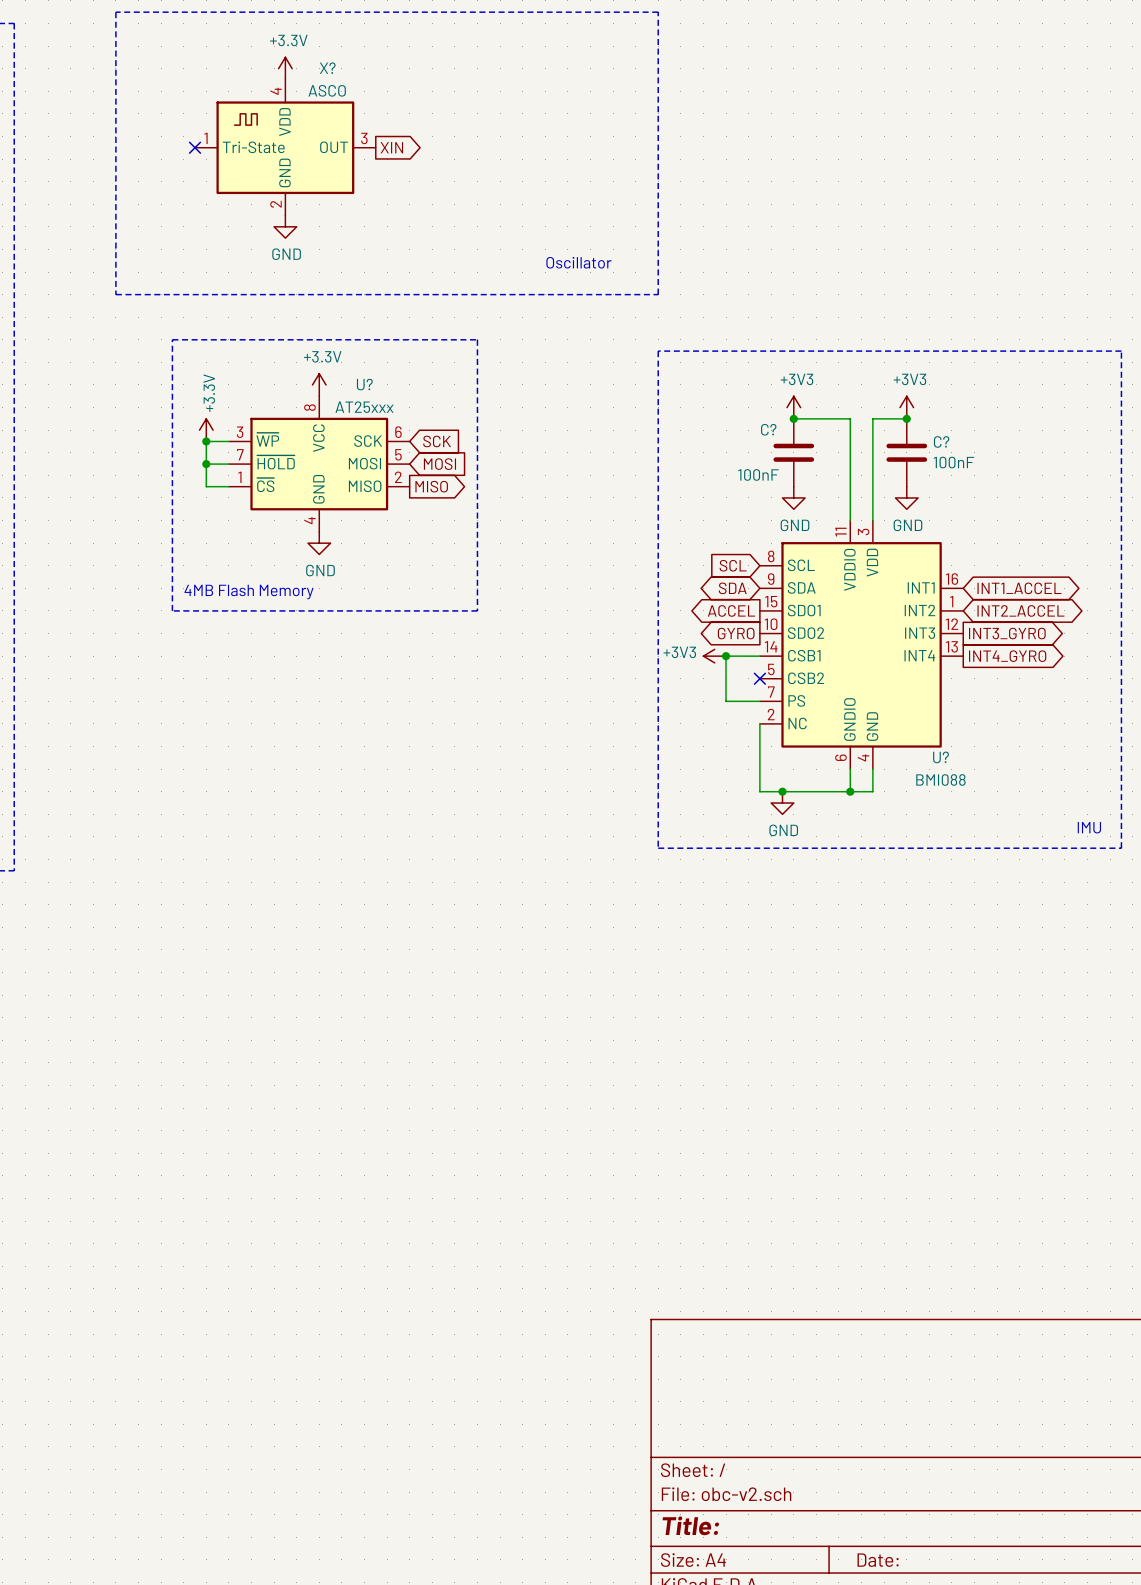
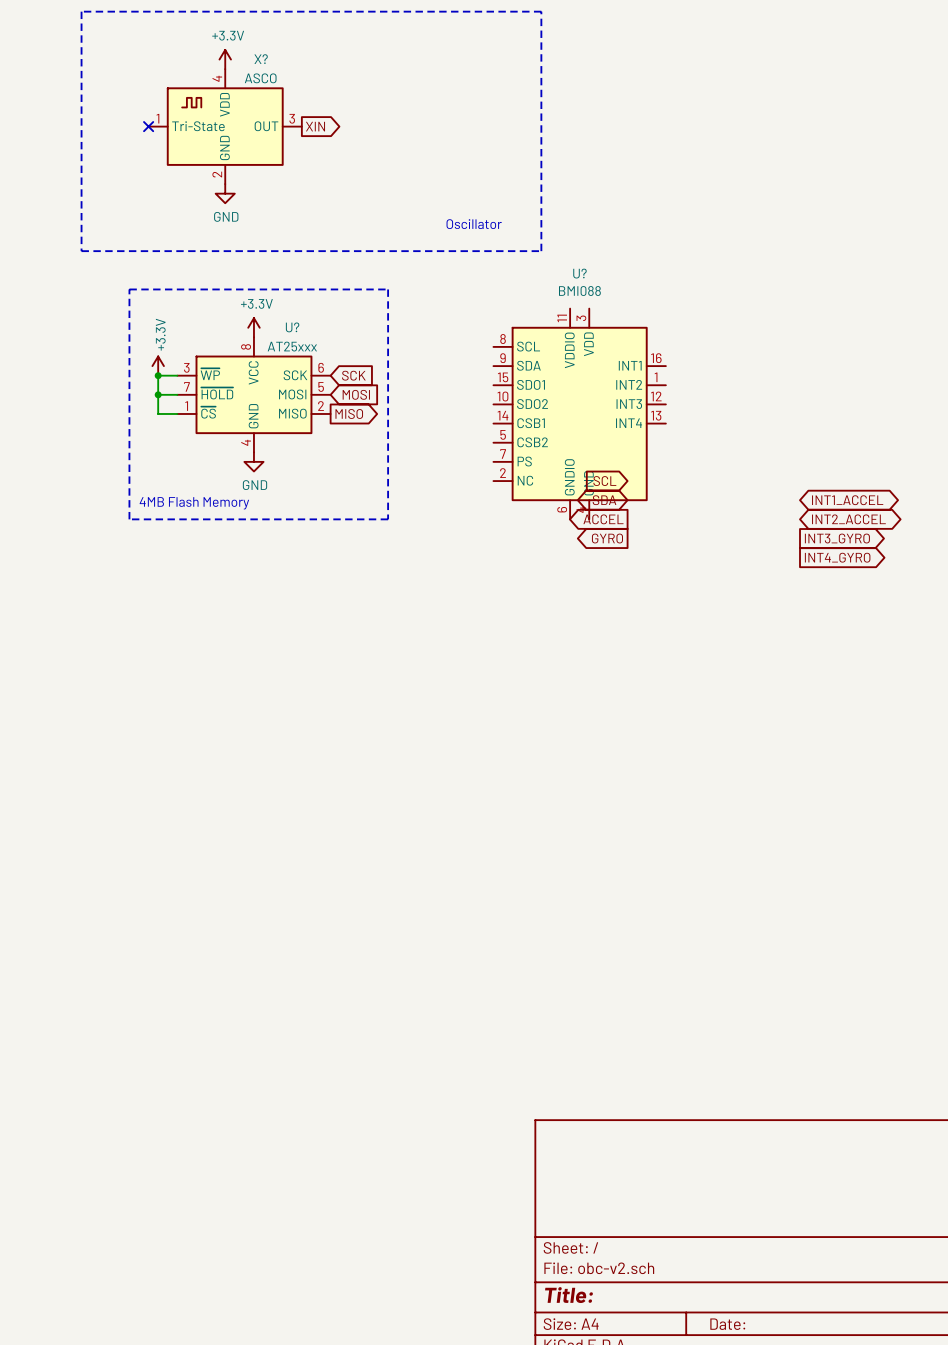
line: (658, 351) (658, 848) (1121, 848) (1121, 351) (658, 351) -> none
power symbol: +3V3 (793, 407) -> none
power symbol: +3V3 (906, 407) -> none
wire: (793, 418) (850, 418) (850, 520) -> none
junction: (793, 418) -> none
wire: (906, 418) (872, 418) (872, 520) -> none
junction: (906, 418) -> none
C?: 100nF (793, 452) -> none
C?: 100nF (906, 452) -> none
U?: none -> BMI088 (579, 413)
power symbol: GND (793, 497) -> none
power symbol: GND (906, 497) -> none
U?: BMI088 (861, 644) -> none
power symbol: +3V3 (714, 656) -> none
junction: (726, 656) -> none
wire: (759, 656) (726, 656) (726, 701) (759, 701) -> none
no-connect mark: (759, 678) -> none
wire: (759, 723) (759, 791) (872, 791) (872, 769) -> none
wire: (850, 769) (850, 791) -> none
junction: (782, 791) -> none
junction: (850, 791) -> none
power symbol: GND (782, 803) -> none
text: IMU (1089, 827) -> none

